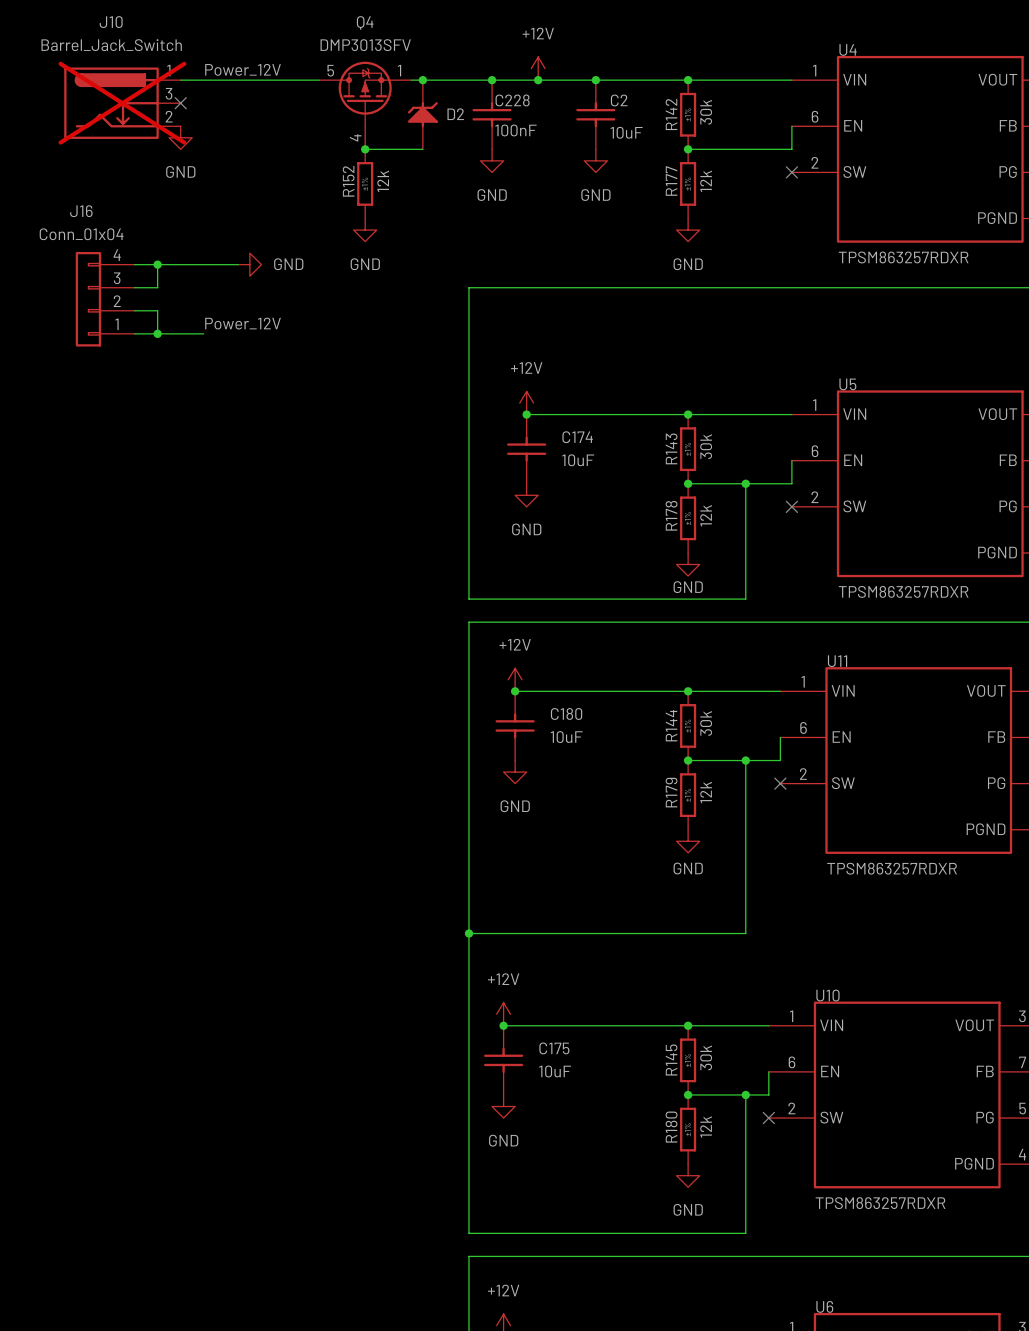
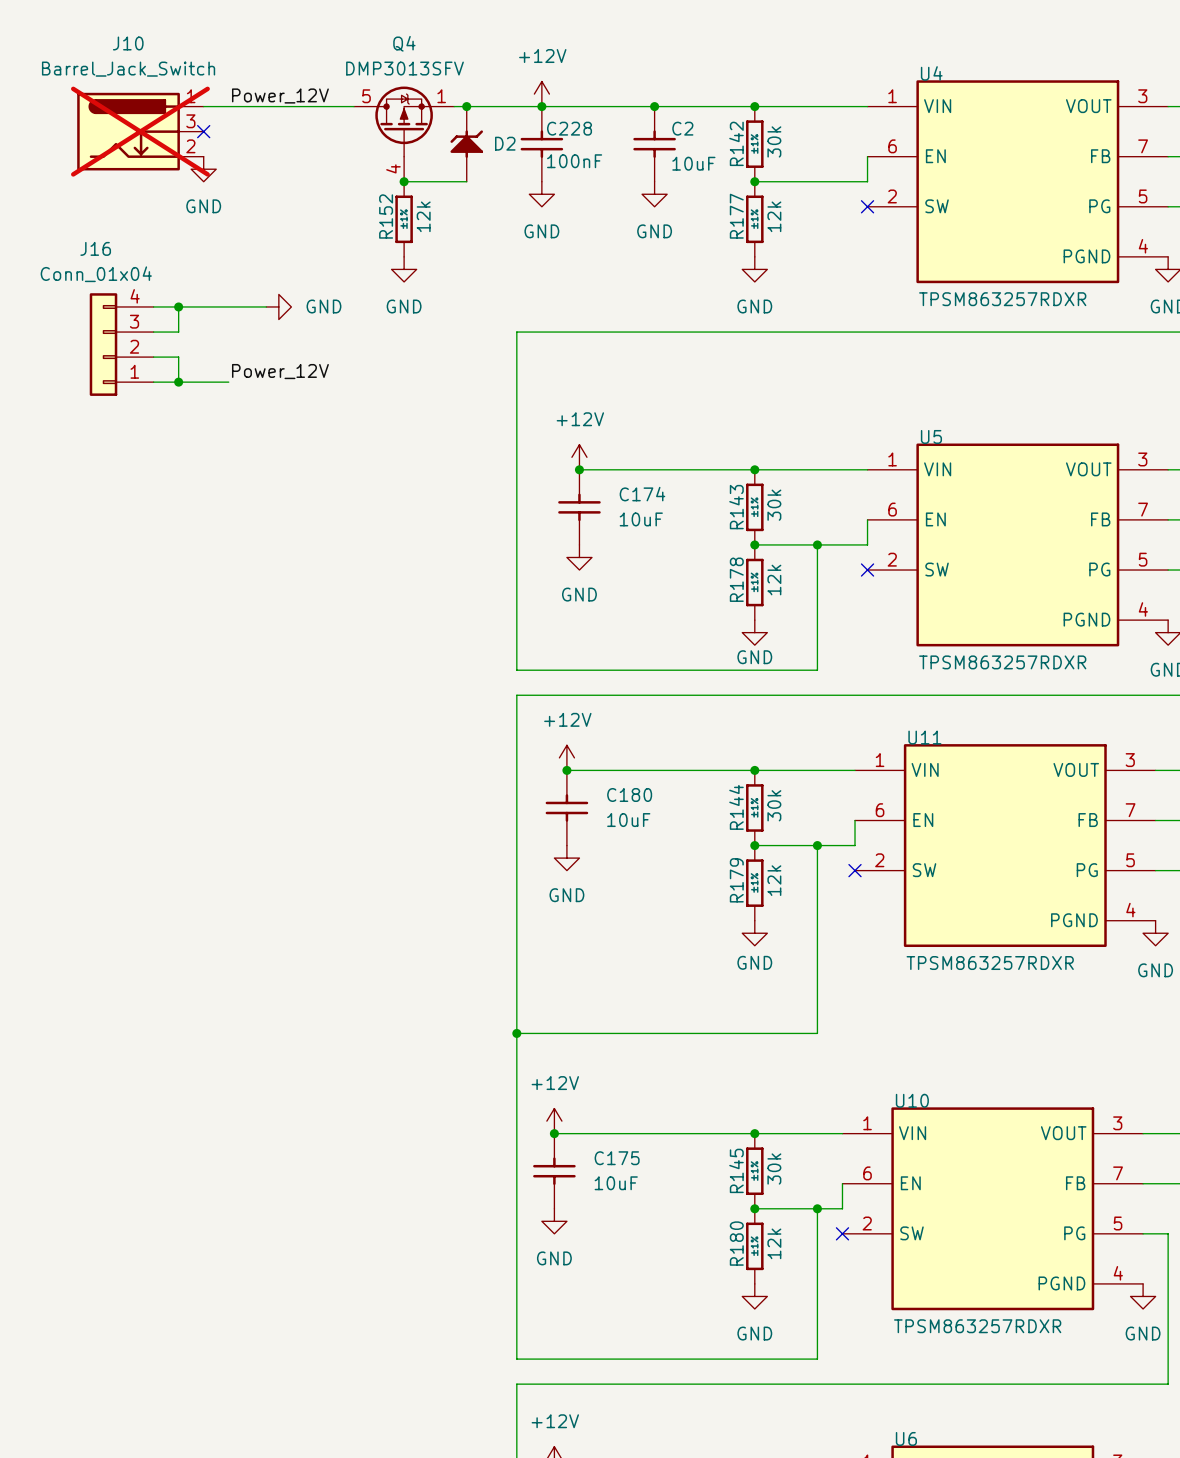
power symbol position: +12V (538, 68) -> +12V (541, 94)
junction: (538, 80) -> none

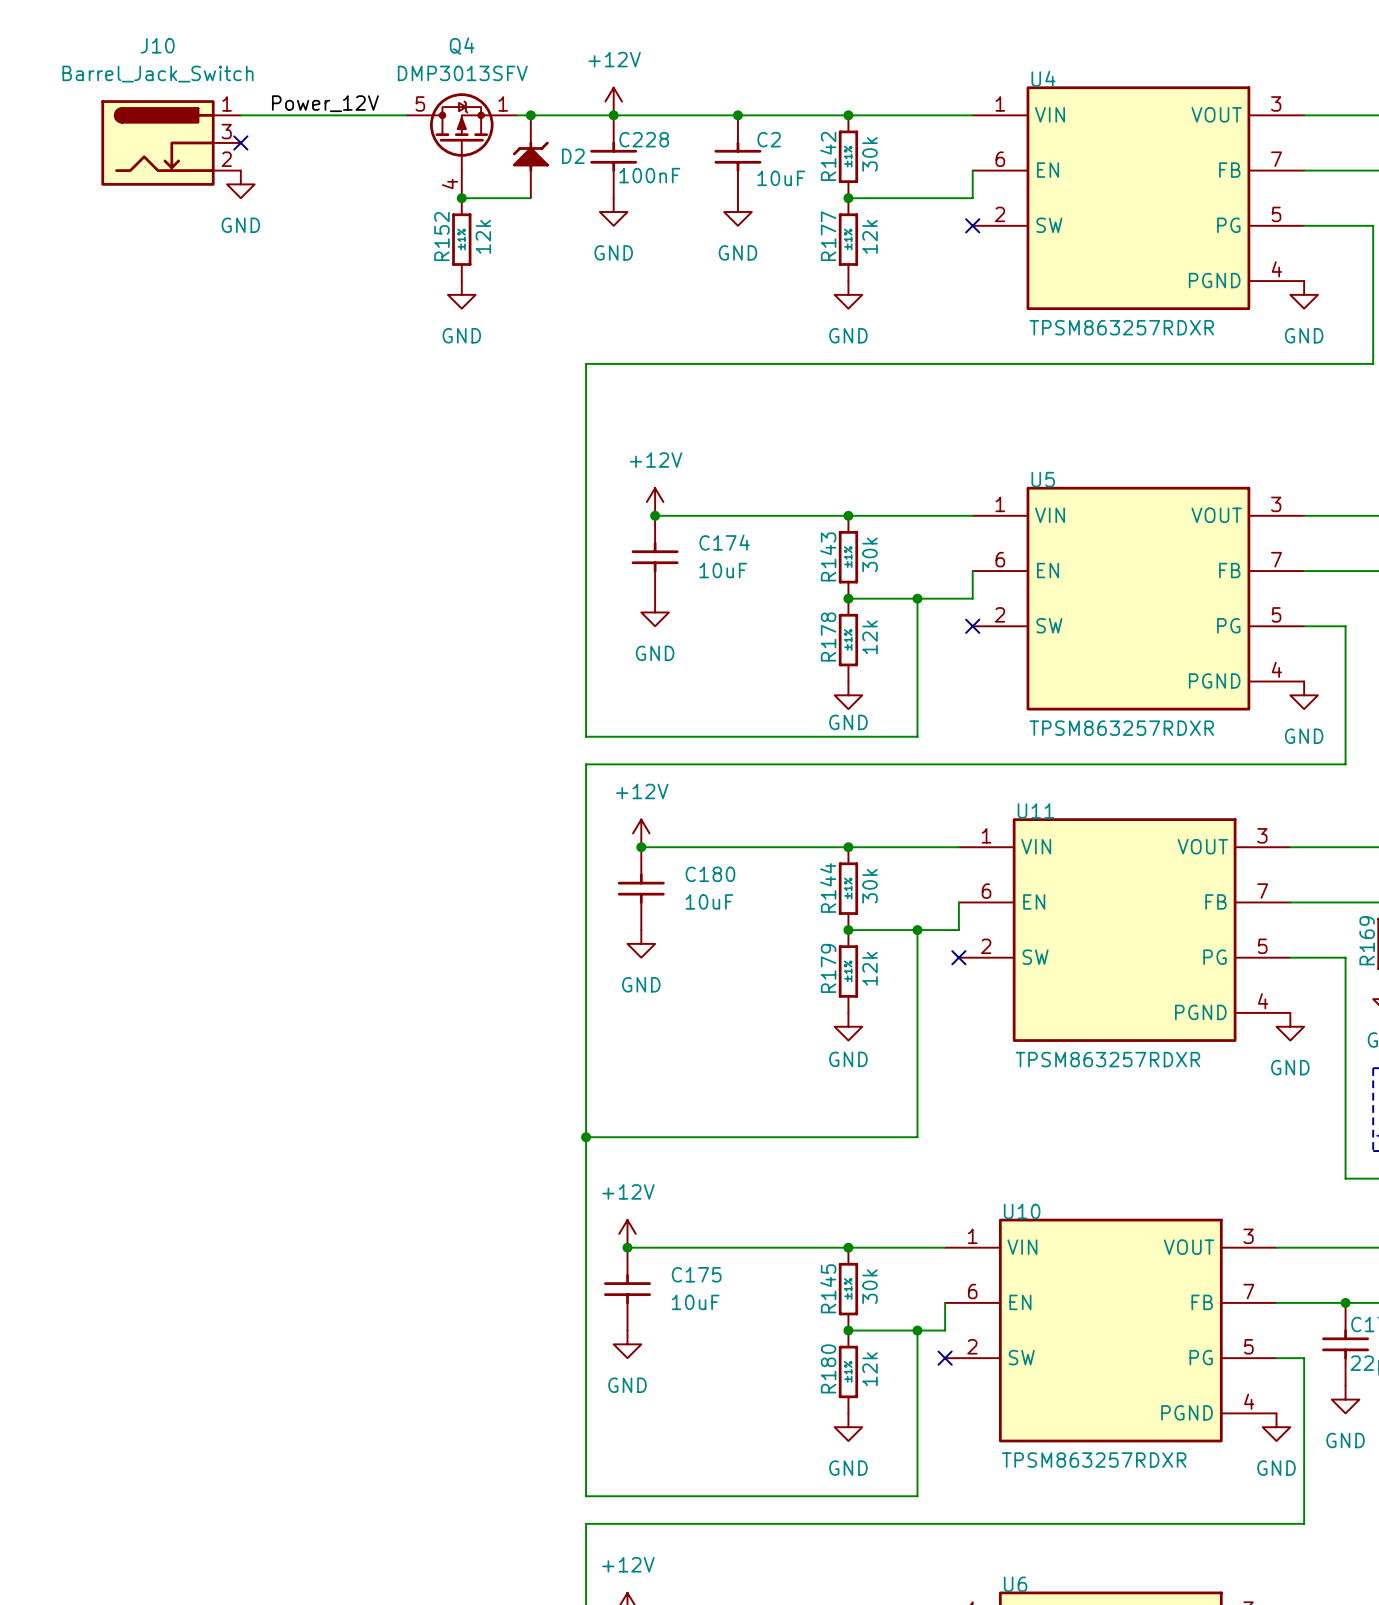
J10 do-not-place cross: (140, 131) -> none
wire: (153, 306) (266, 306) -> none
wire: (178, 306) (178, 332) (153, 332) -> none
junction: (178, 306) -> none
power symbol: GND (278, 306) -> none
J16: Conn_01x04 (121, 344) -> none
wire: (153, 357) (178, 357) (178, 382) -> none
label: Power_12V (280, 371) -> none
wire: (153, 382) (228, 382) -> none
junction: (178, 382) -> none

